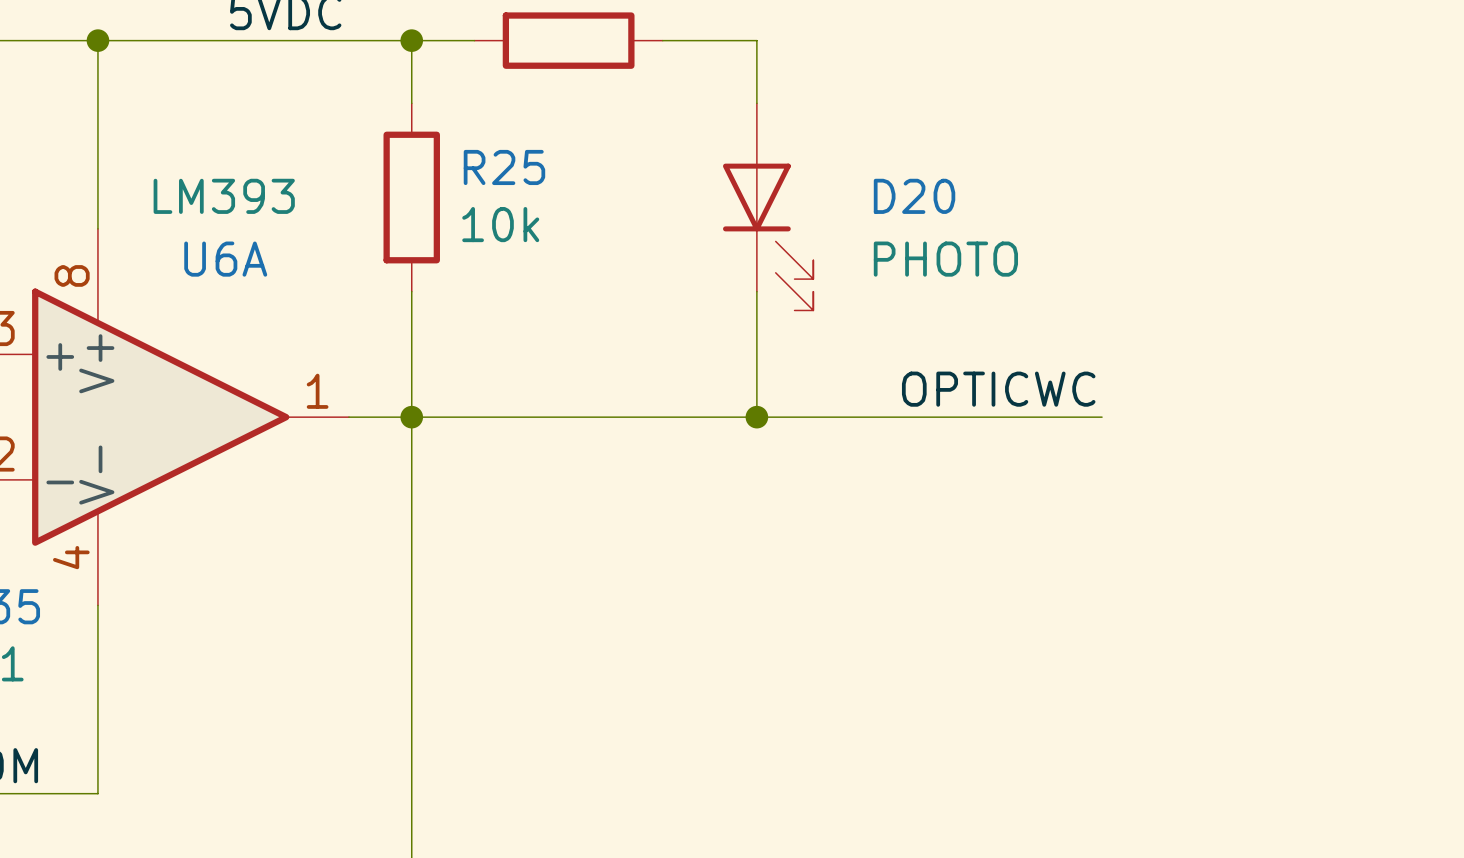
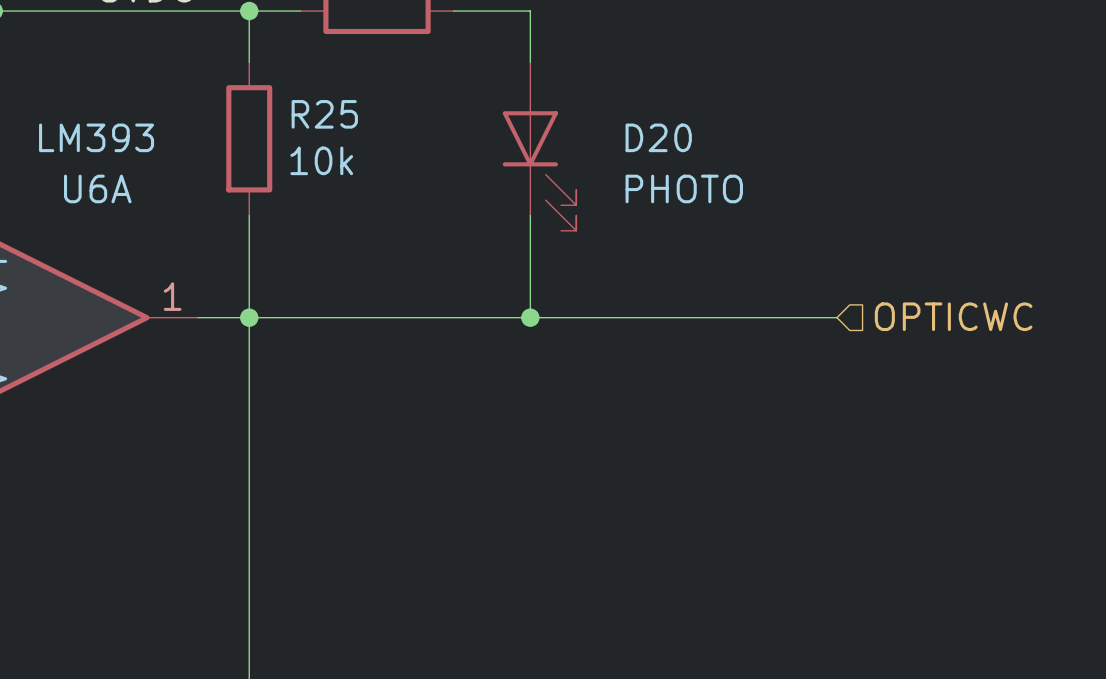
label: OPTICWC (998, 389) -> none
hierarchical label: none -> OPTICWC (953, 316)
wire: none -> (811, 317) (836, 317)

